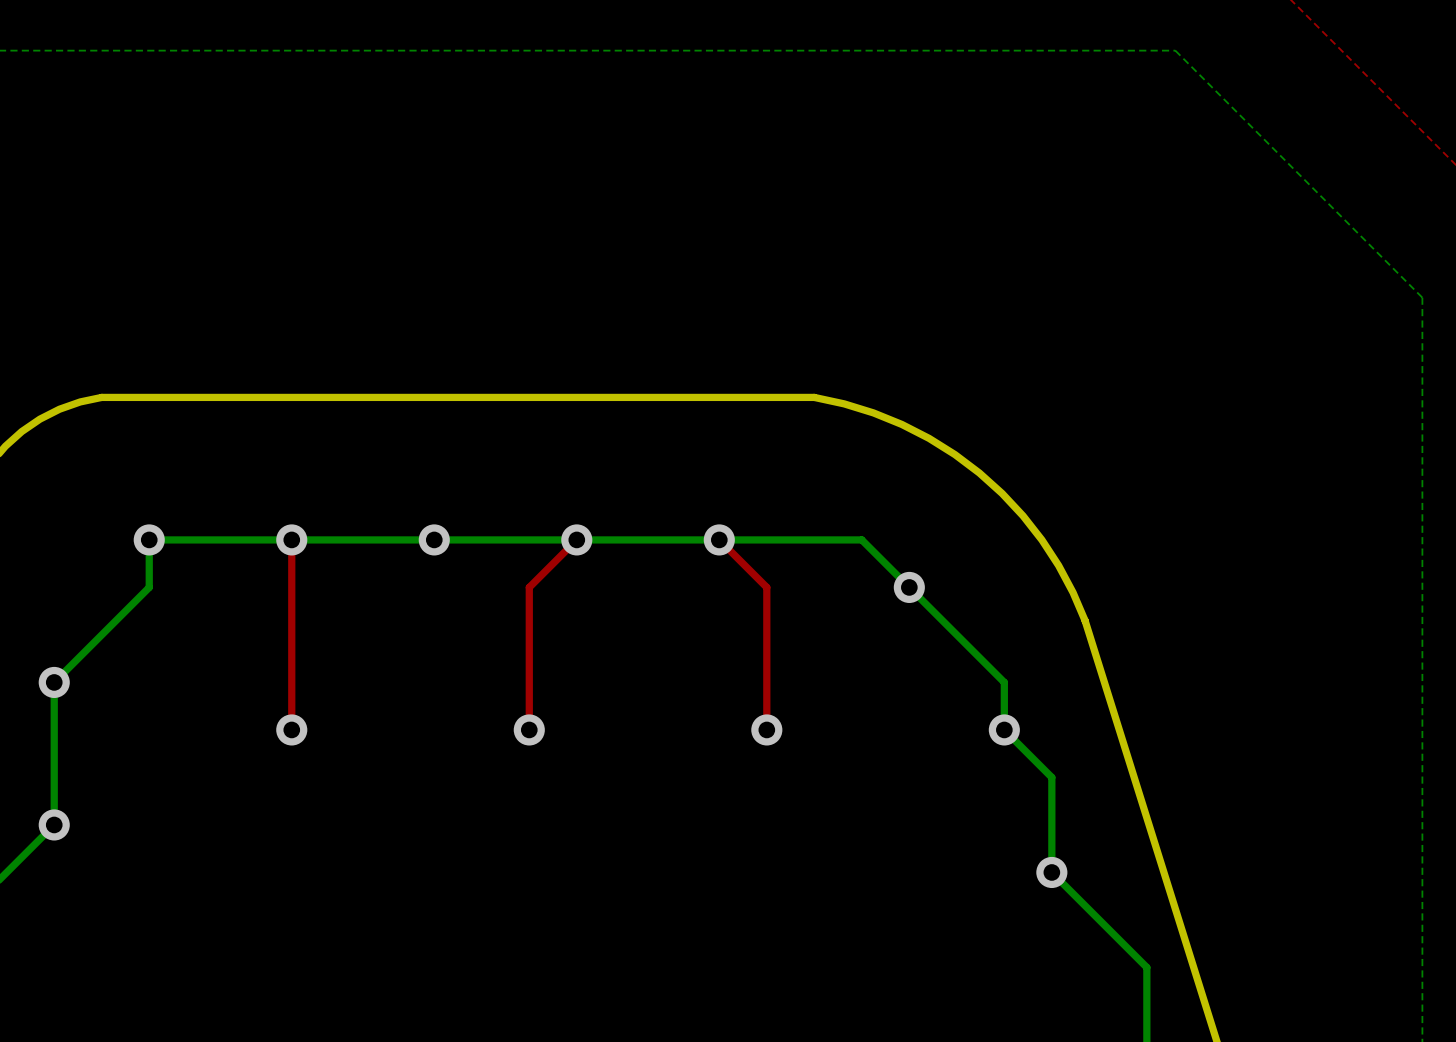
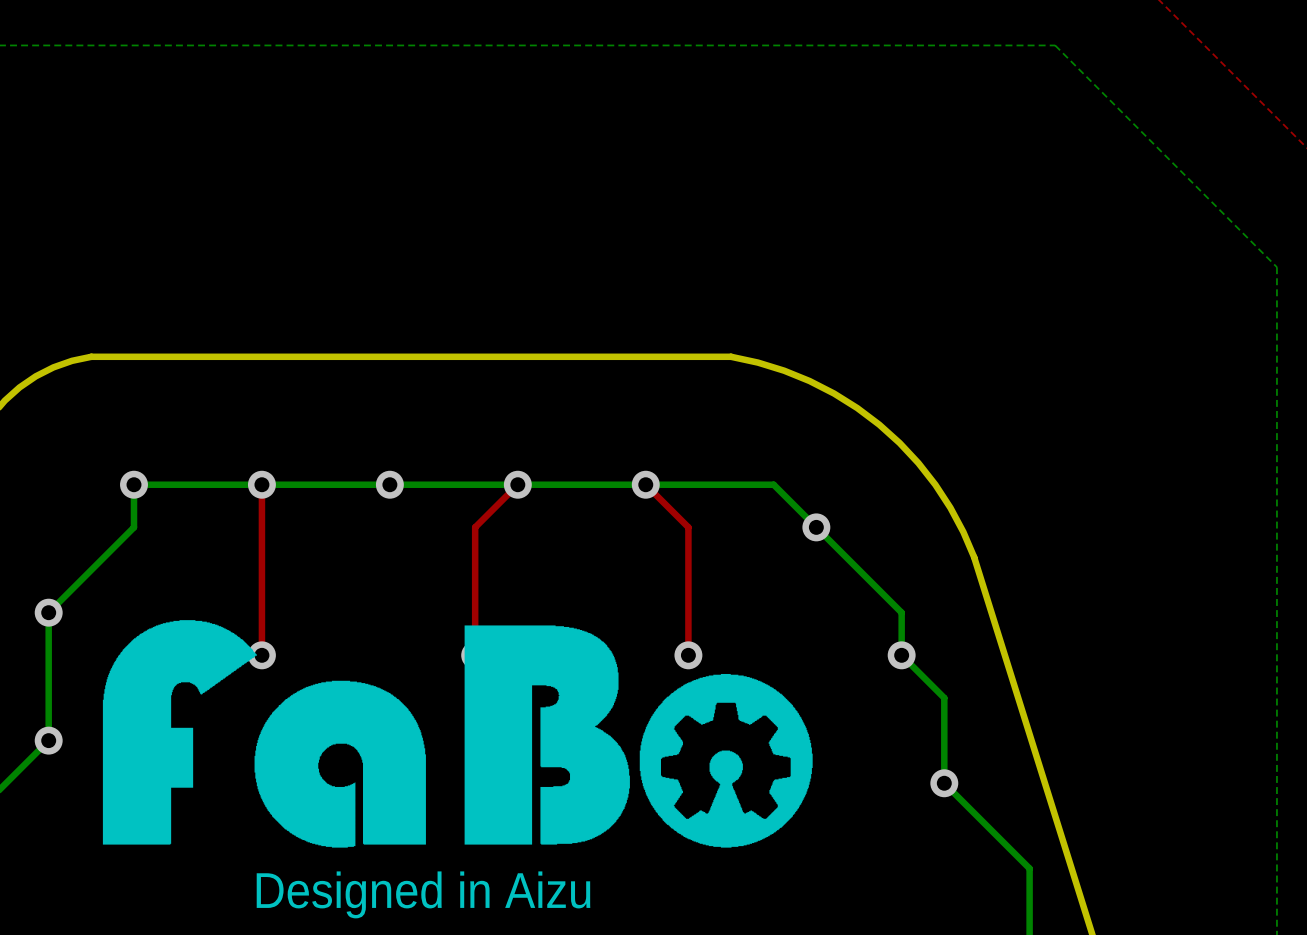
drawing: none -> [102, 620, 813, 848]
text: none -> Designed in Aizu (423, 894)

